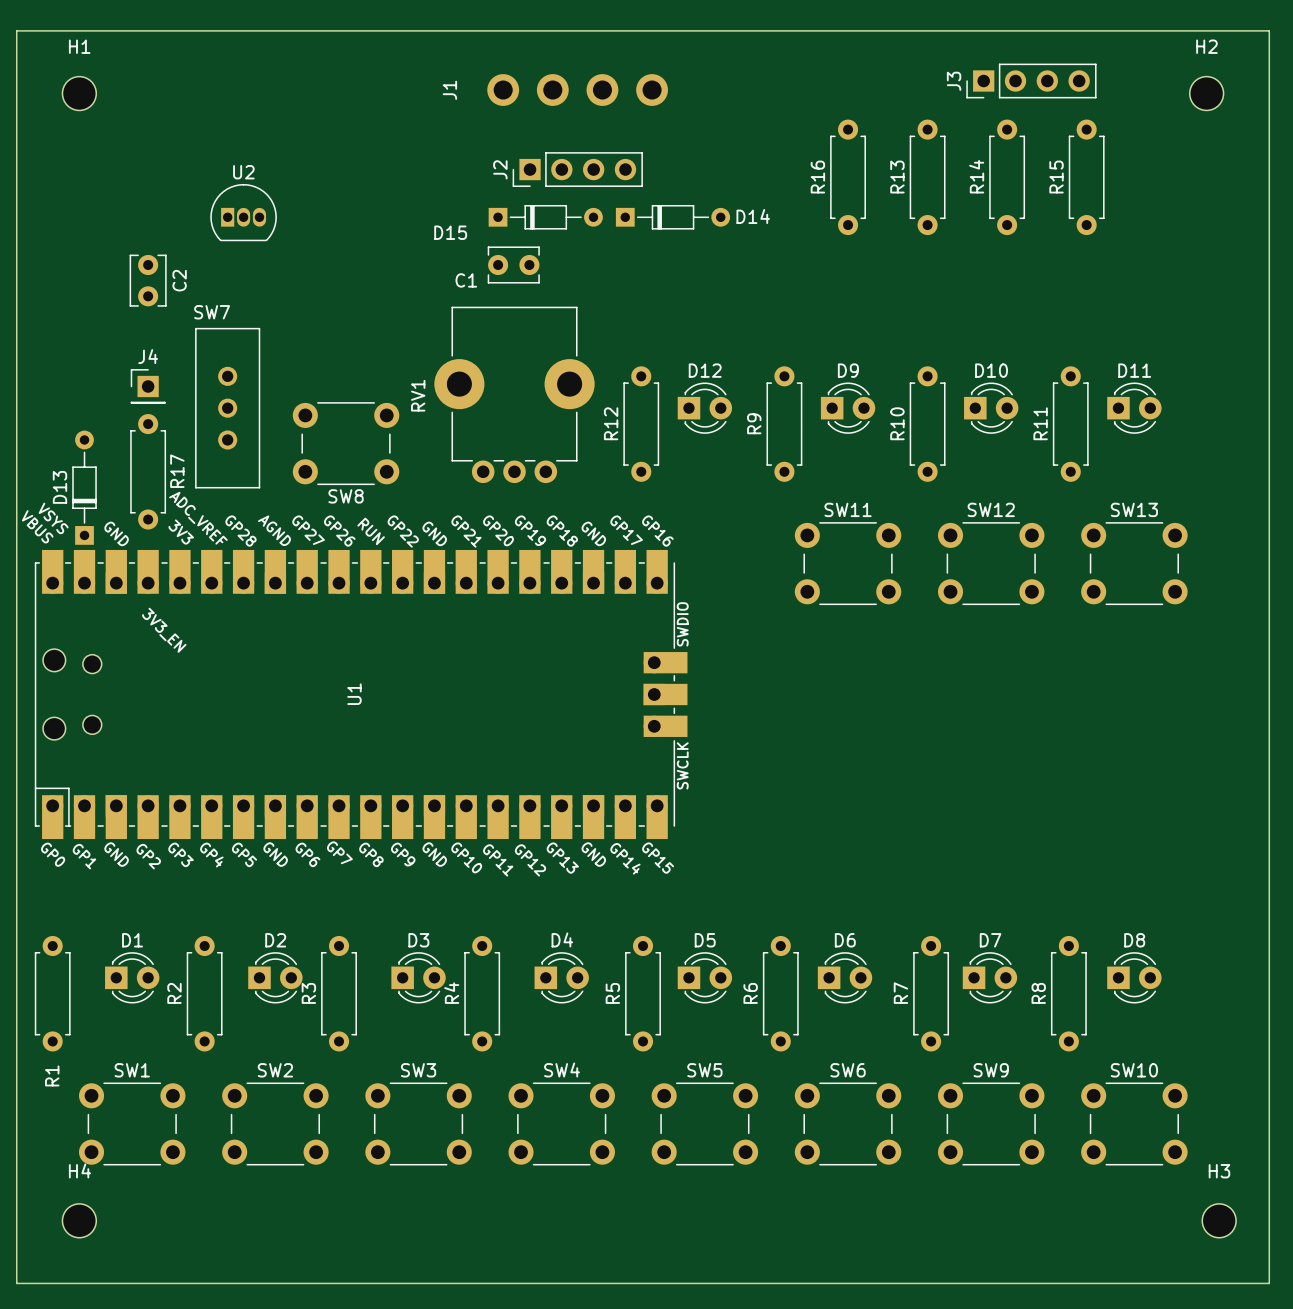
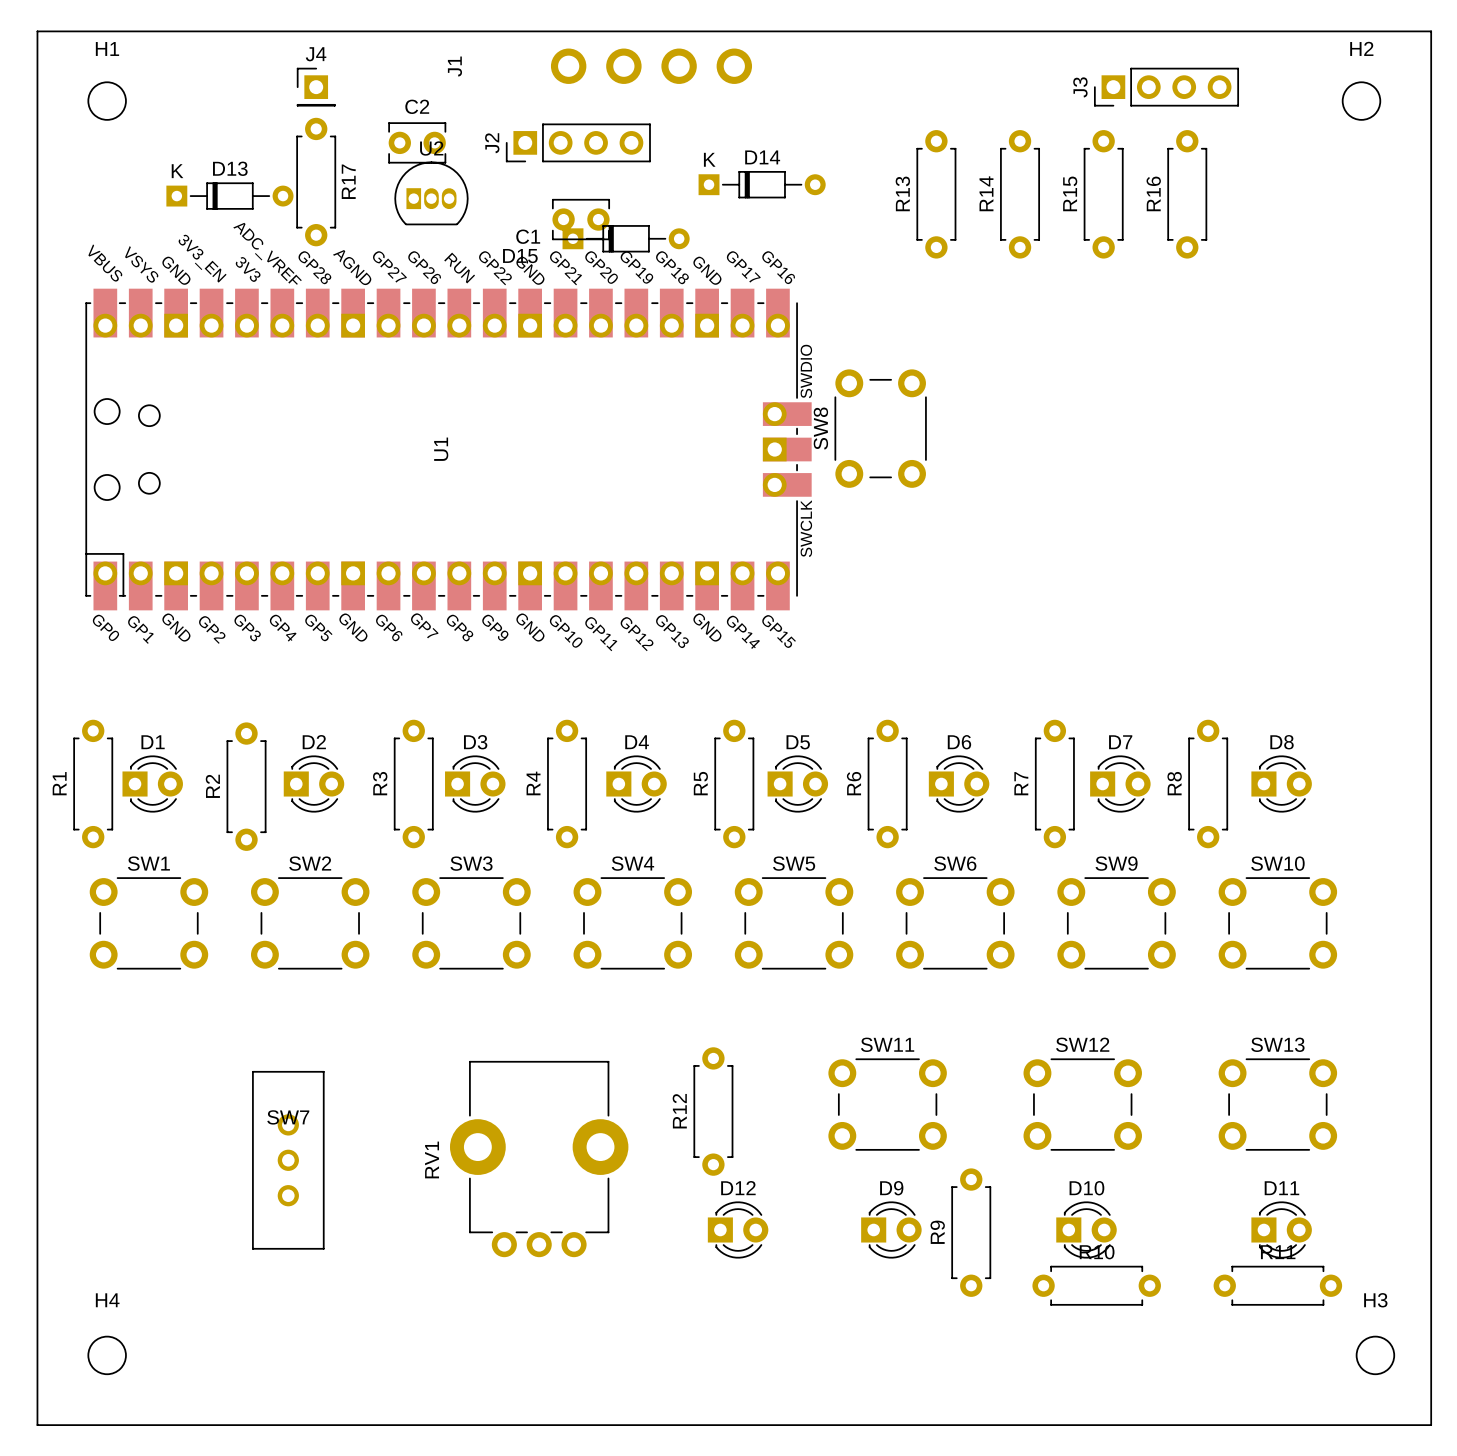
J1 name position: J1 (449, 90) -> J1 (454, 66)
J1 position: (577, 90) -> (651, 66)
D14 text: none -> K (709, 159)
J2 position: (577, 169) -> (578, 142)
R16 position: (848, 177) -> (1187, 194)
R13 position: (927, 177) -> (936, 194)
R14 position: (1007, 177) -> (1020, 194)
R15 position: (1086, 177) -> (1103, 194)
U2 position: (243, 212) -> (431, 193)
D14 name position: D14 (753, 216) -> D14 (762, 157)
D14 position: (673, 217) -> (762, 184)
C1 position: (513, 265) -> (581, 219)
C2 rotation: 0° (148, 280) -> 90° clockwise (417, 142)
C2 position: (148, 280) -> (417, 142)
C2 name position: C2 (179, 280) -> C2 (417, 106)
SW7 name position: SW7 (212, 312) -> SW7 (288, 1117)
J4 position: (148, 386) -> (316, 87)
RV1 position: (514, 394) -> (539, 1159)
SW7 position: (227, 408) -> (288, 1160)
D12 position: (704, 408) -> (738, 1229)
D9 position: (848, 408) -> (891, 1229)
D10 position: (991, 408) -> (1086, 1229)
D11 position: (1134, 408) -> (1281, 1229)
R12 position: (641, 424) -> (713, 1111)
R9 position: (784, 424) -> (971, 1232)
R10 rotation: 0° (927, 424) -> 90° clockwise (1096, 1285)
R10 position: (927, 424) -> (1096, 1285)
R11 rotation: 0° (1070, 424) -> 90° clockwise (1277, 1285)
R11 position: (1070, 424) -> (1277, 1285)
D13 footprint: [72, 430, 97, 545] -> [166, 182, 294, 210]
SW8 rotation: 0° (346, 443) -> 90° clockwise (880, 428)
SW8 position: (346, 443) -> (880, 428)
R17 position: (148, 471) -> (316, 182)
D13 name position: D13 (59, 487) -> D13 (230, 168)
U1 text position: VSYS (53, 518) -> VSYS (141, 264)
U1 text position: VBUS (37, 526) -> VBUS (105, 263)
SW11 position: (848, 563) -> (887, 1104)
SW12 position: (991, 563) -> (1082, 1104)
SW13 position: (1134, 563) -> (1277, 1104)
U1 text position: 3V3_EN (164, 630) -> 3V3_EN (202, 258)
U1 position: (361, 694) -> (448, 449)
D1 position: (132, 977) -> (152, 784)
D2 position: (275, 977) -> (313, 784)
D3 position: (418, 977) -> (475, 784)
D4 position: (561, 977) -> (636, 784)
D5 position: (704, 977) -> (797, 784)
D6 position: (845, 977) -> (959, 784)
D7 position: (989, 977) -> (1120, 784)
D8 position: (1134, 977) -> (1281, 784)
R1 position: (52, 993) -> (93, 784)
R2 position: (204, 993) -> (246, 786)
R3 position: (339, 993) -> (413, 784)
R4 position: (482, 993) -> (567, 784)
R5 position: (643, 993) -> (734, 784)
R6 position: (780, 993) -> (887, 784)
R7 position: (931, 993) -> (1054, 784)
R8 position: (1068, 993) -> (1208, 784)
R1 name position: R1 (52, 1075) -> R1 (59, 783)
SW1 position: (132, 1123) -> (148, 923)
SW2 position: (275, 1123) -> (310, 923)
SW3 position: (418, 1123) -> (471, 923)
SW4 position: (561, 1123) -> (632, 923)
SW5 position: (704, 1123) -> (794, 923)
SW6 position: (848, 1123) -> (955, 923)
SW9 position: (991, 1123) -> (1116, 923)
SW10 position: (1134, 1123) -> (1277, 923)

